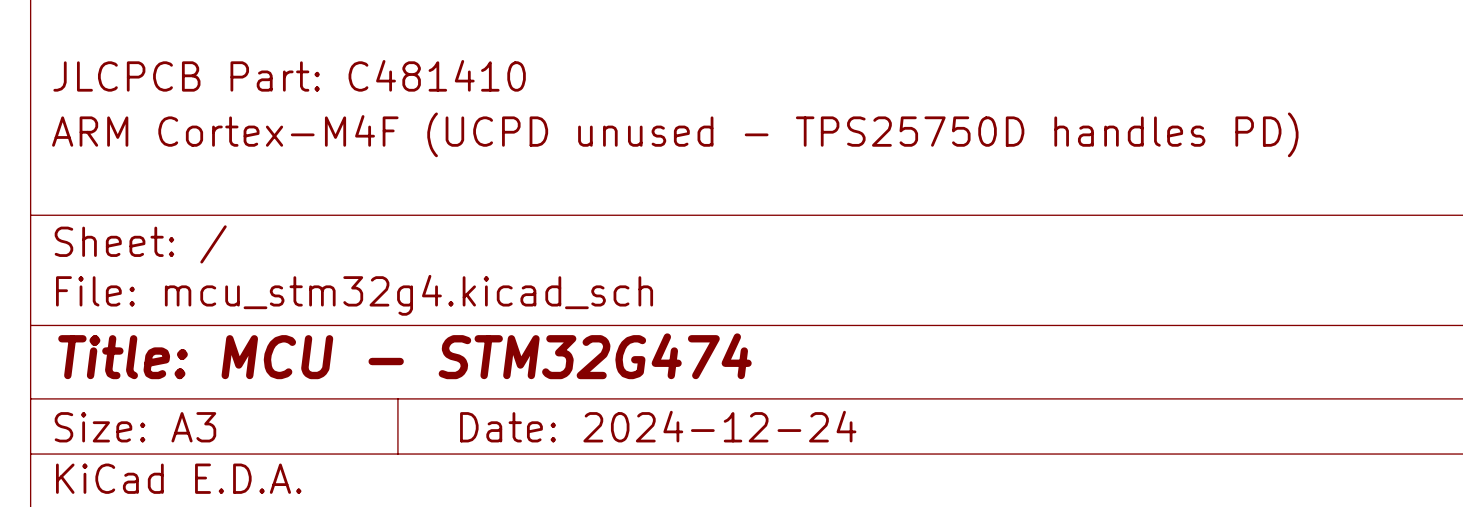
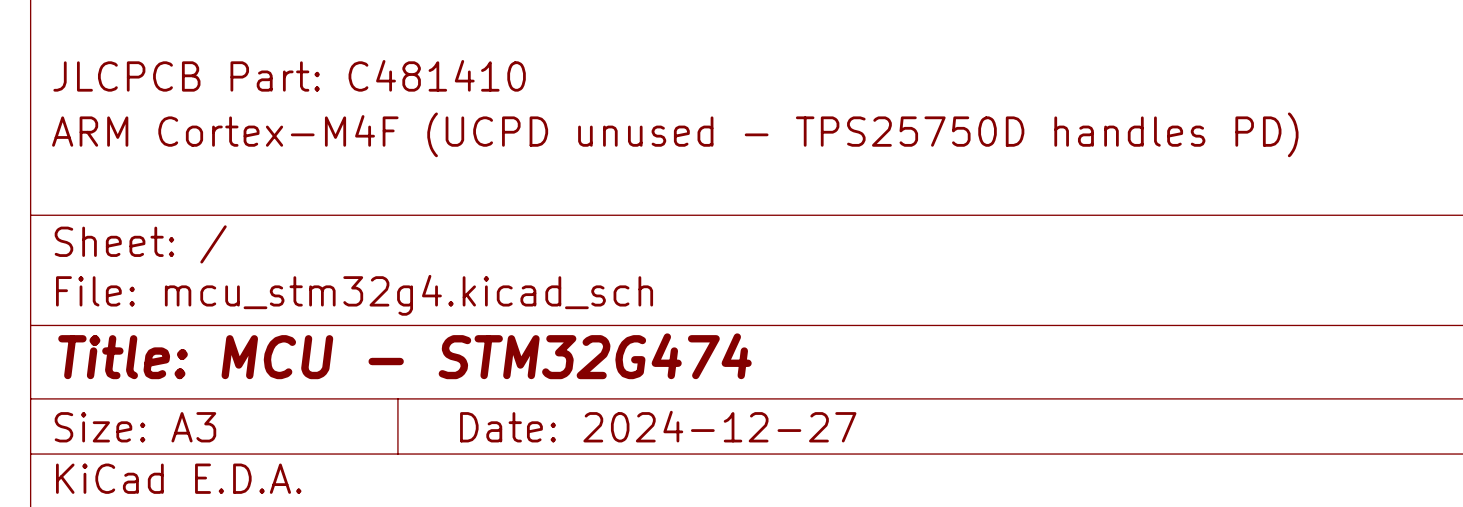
title block: Date: 2024-12-24 (658, 426) -> Date: 2024-12-27 (658, 426)

